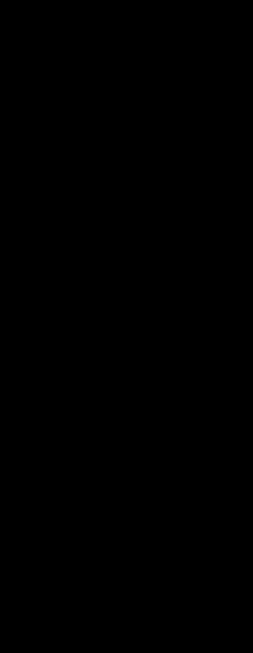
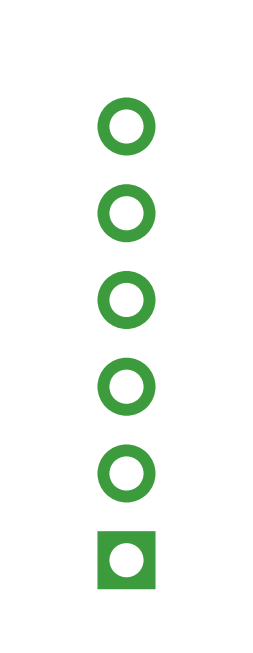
part: none -> (126, 343)

